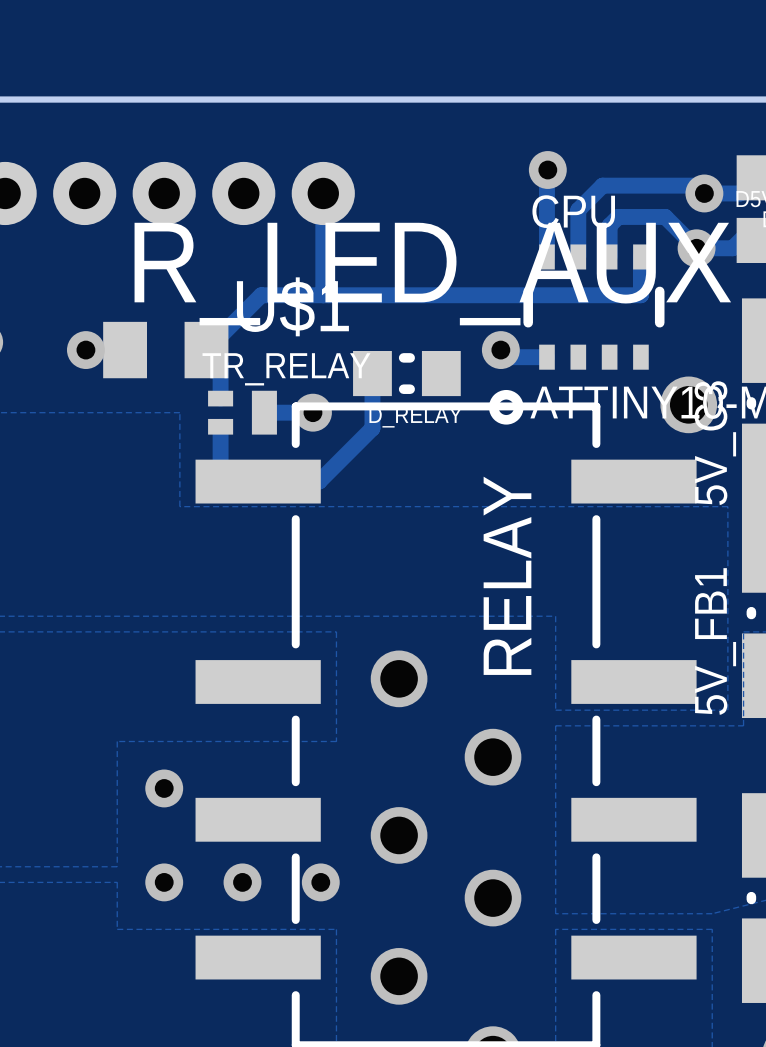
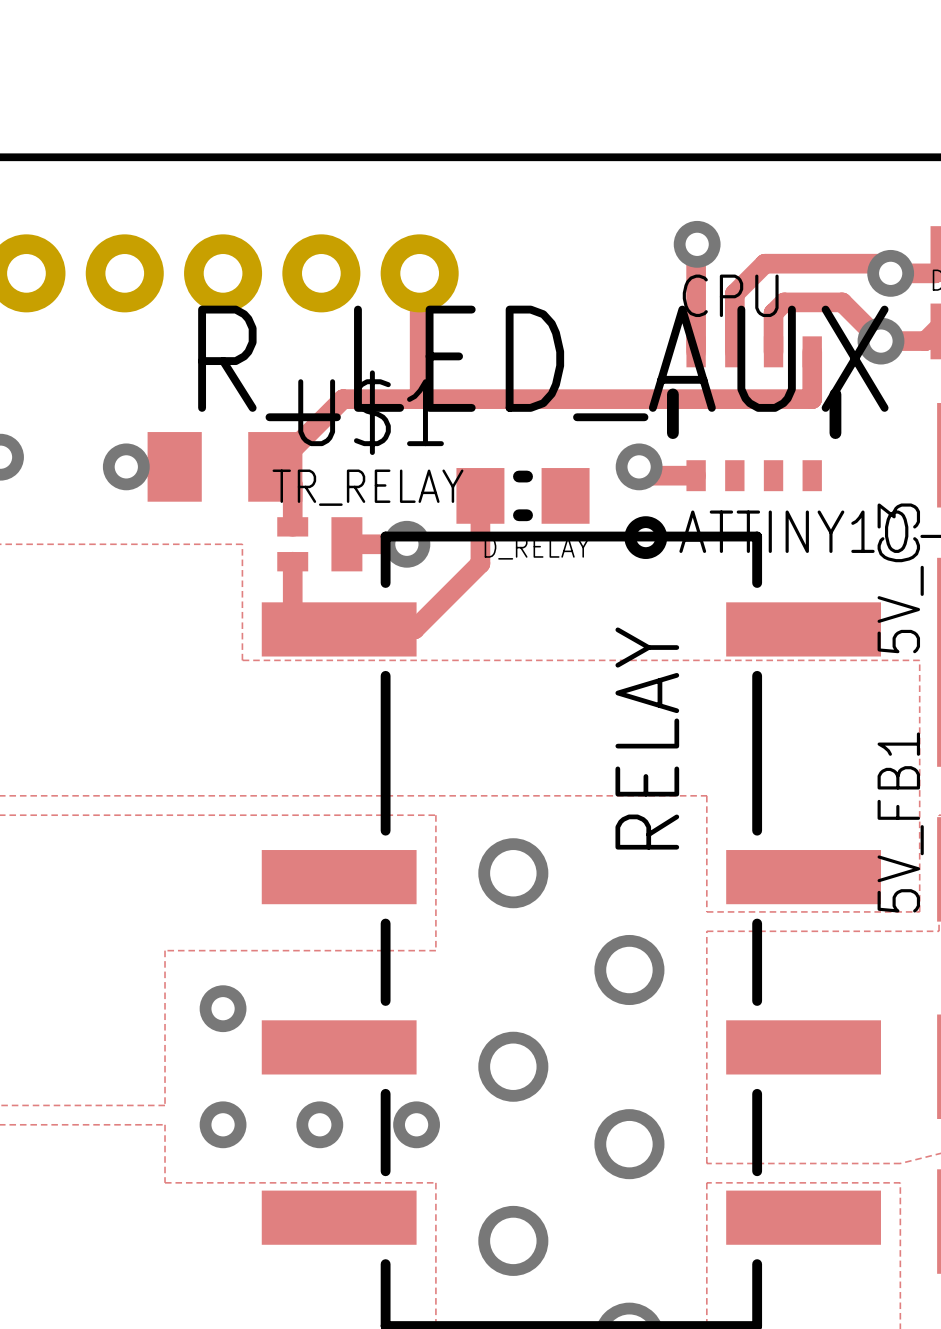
via: (688, 404) -> none

